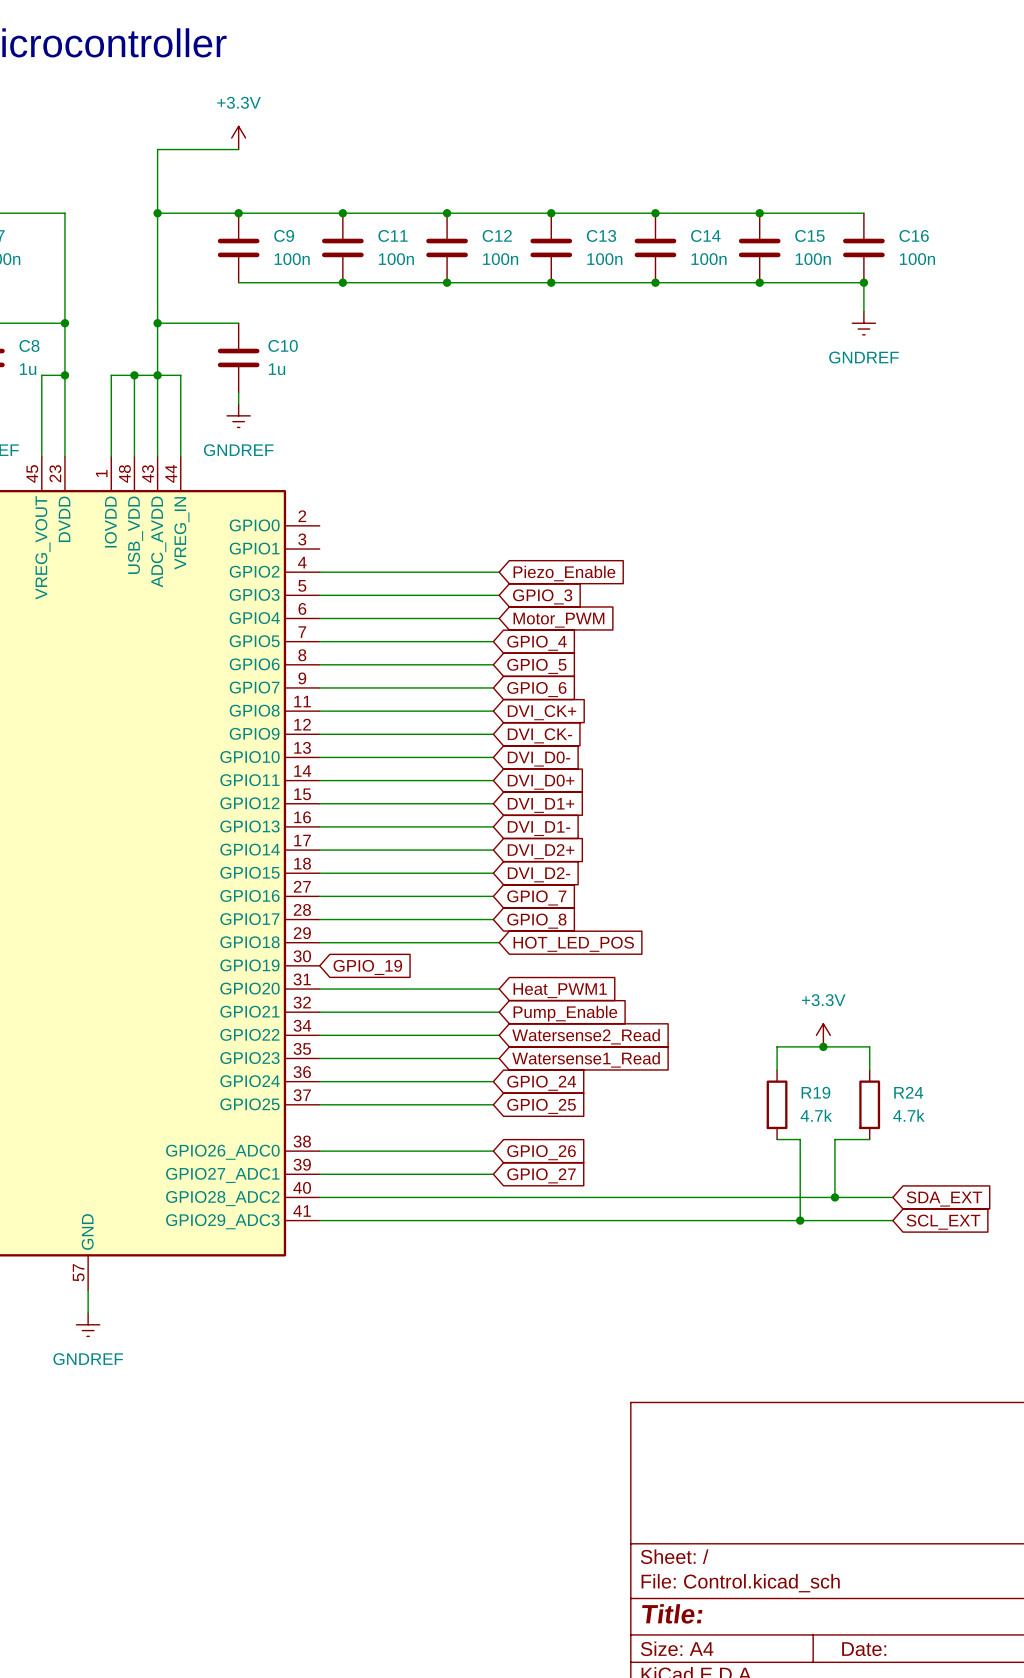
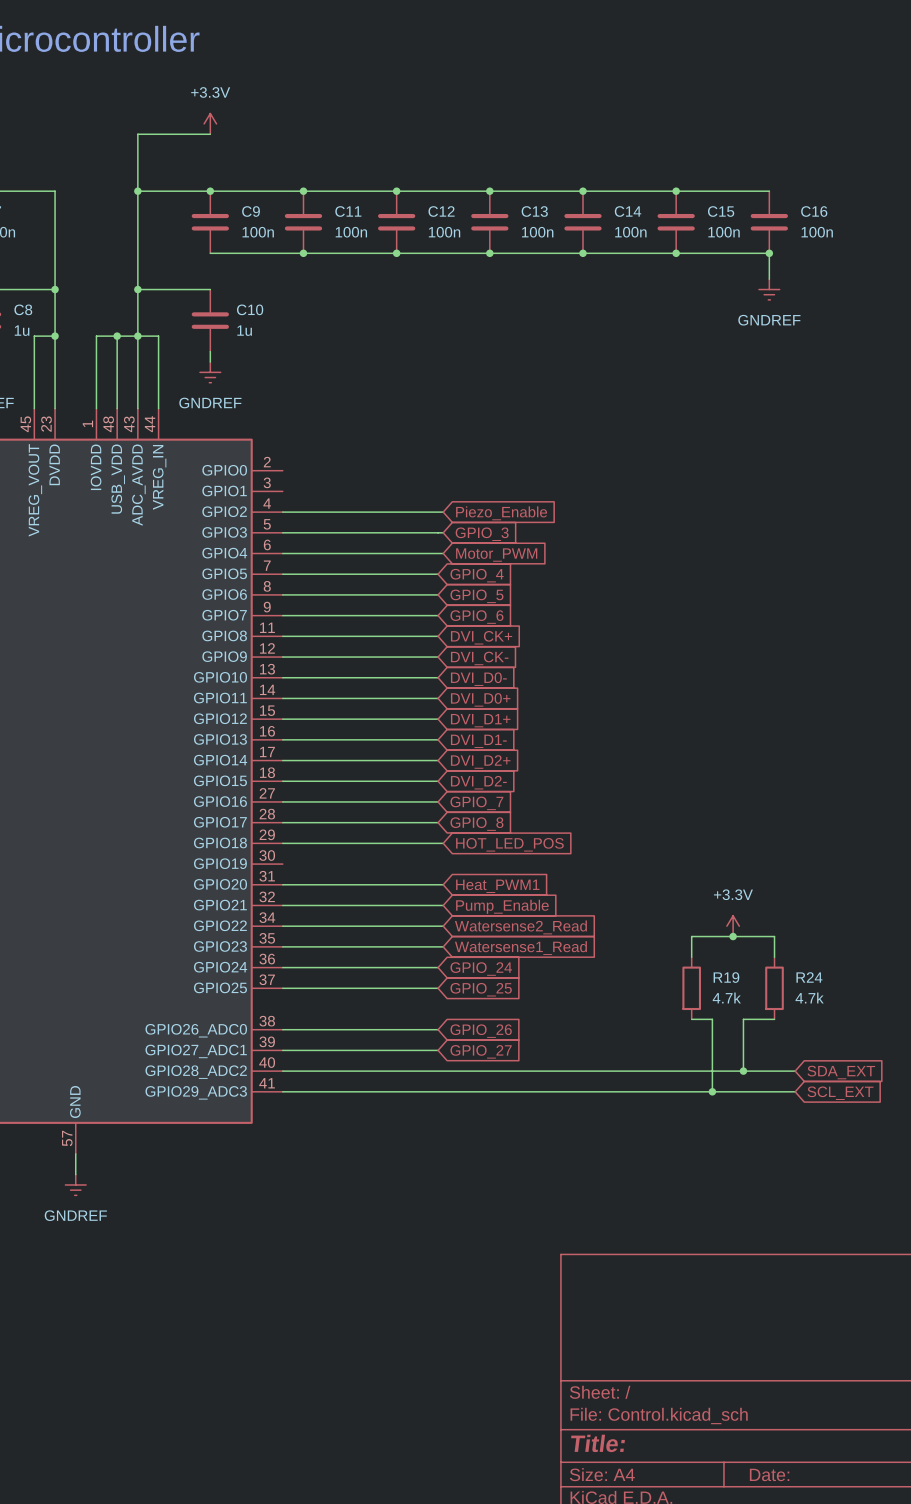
global label: GPIO_19 (367, 967) -> none

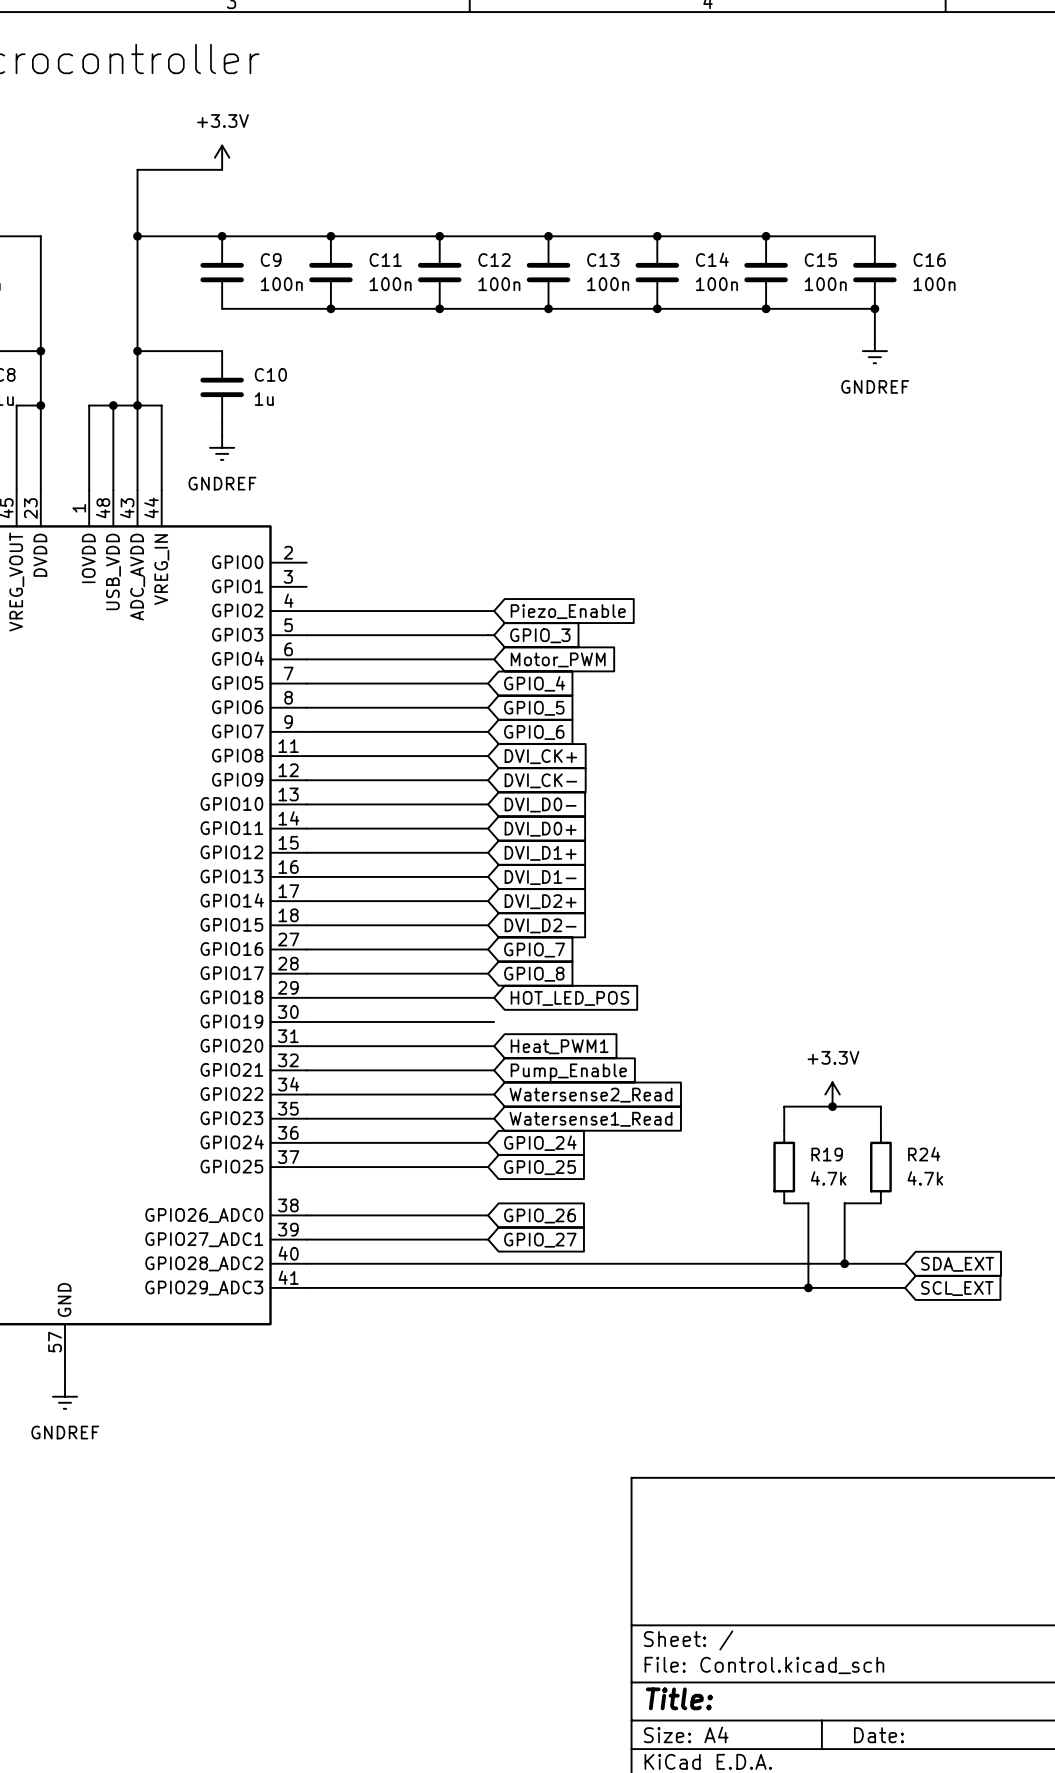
wire: none -> (306, 1022) (494, 1022)

